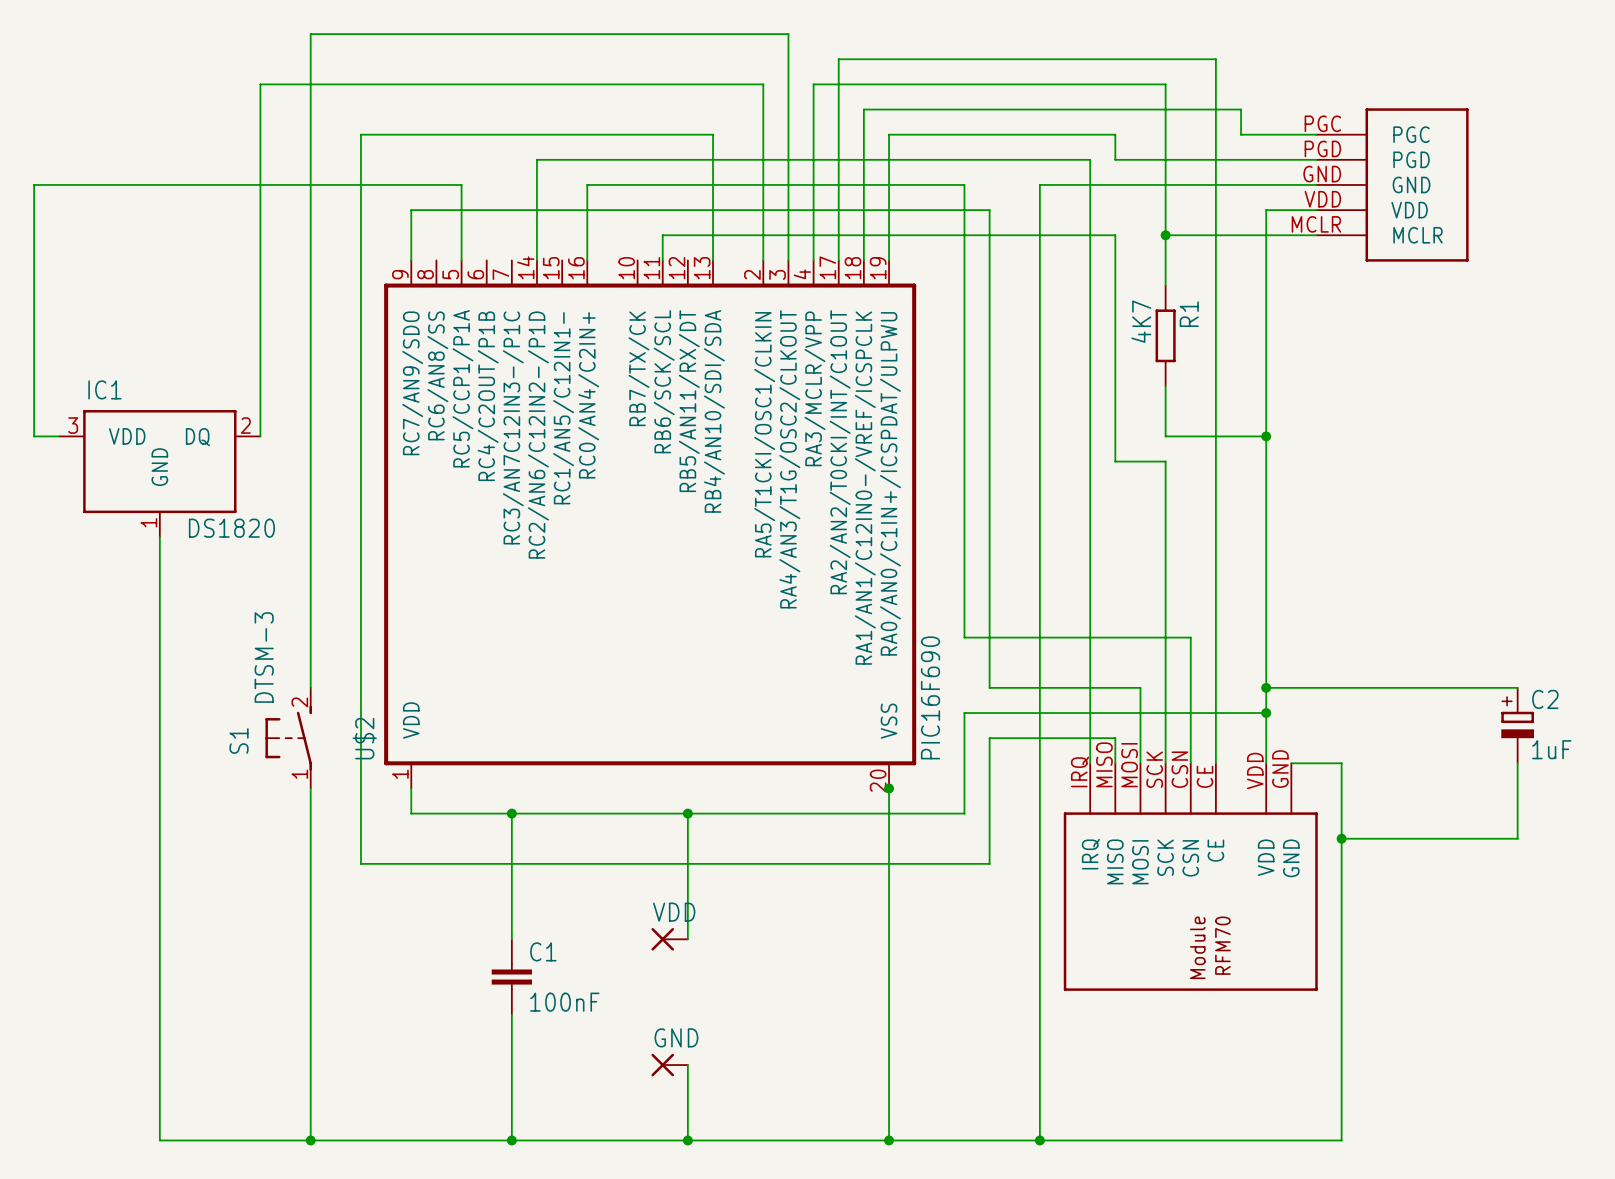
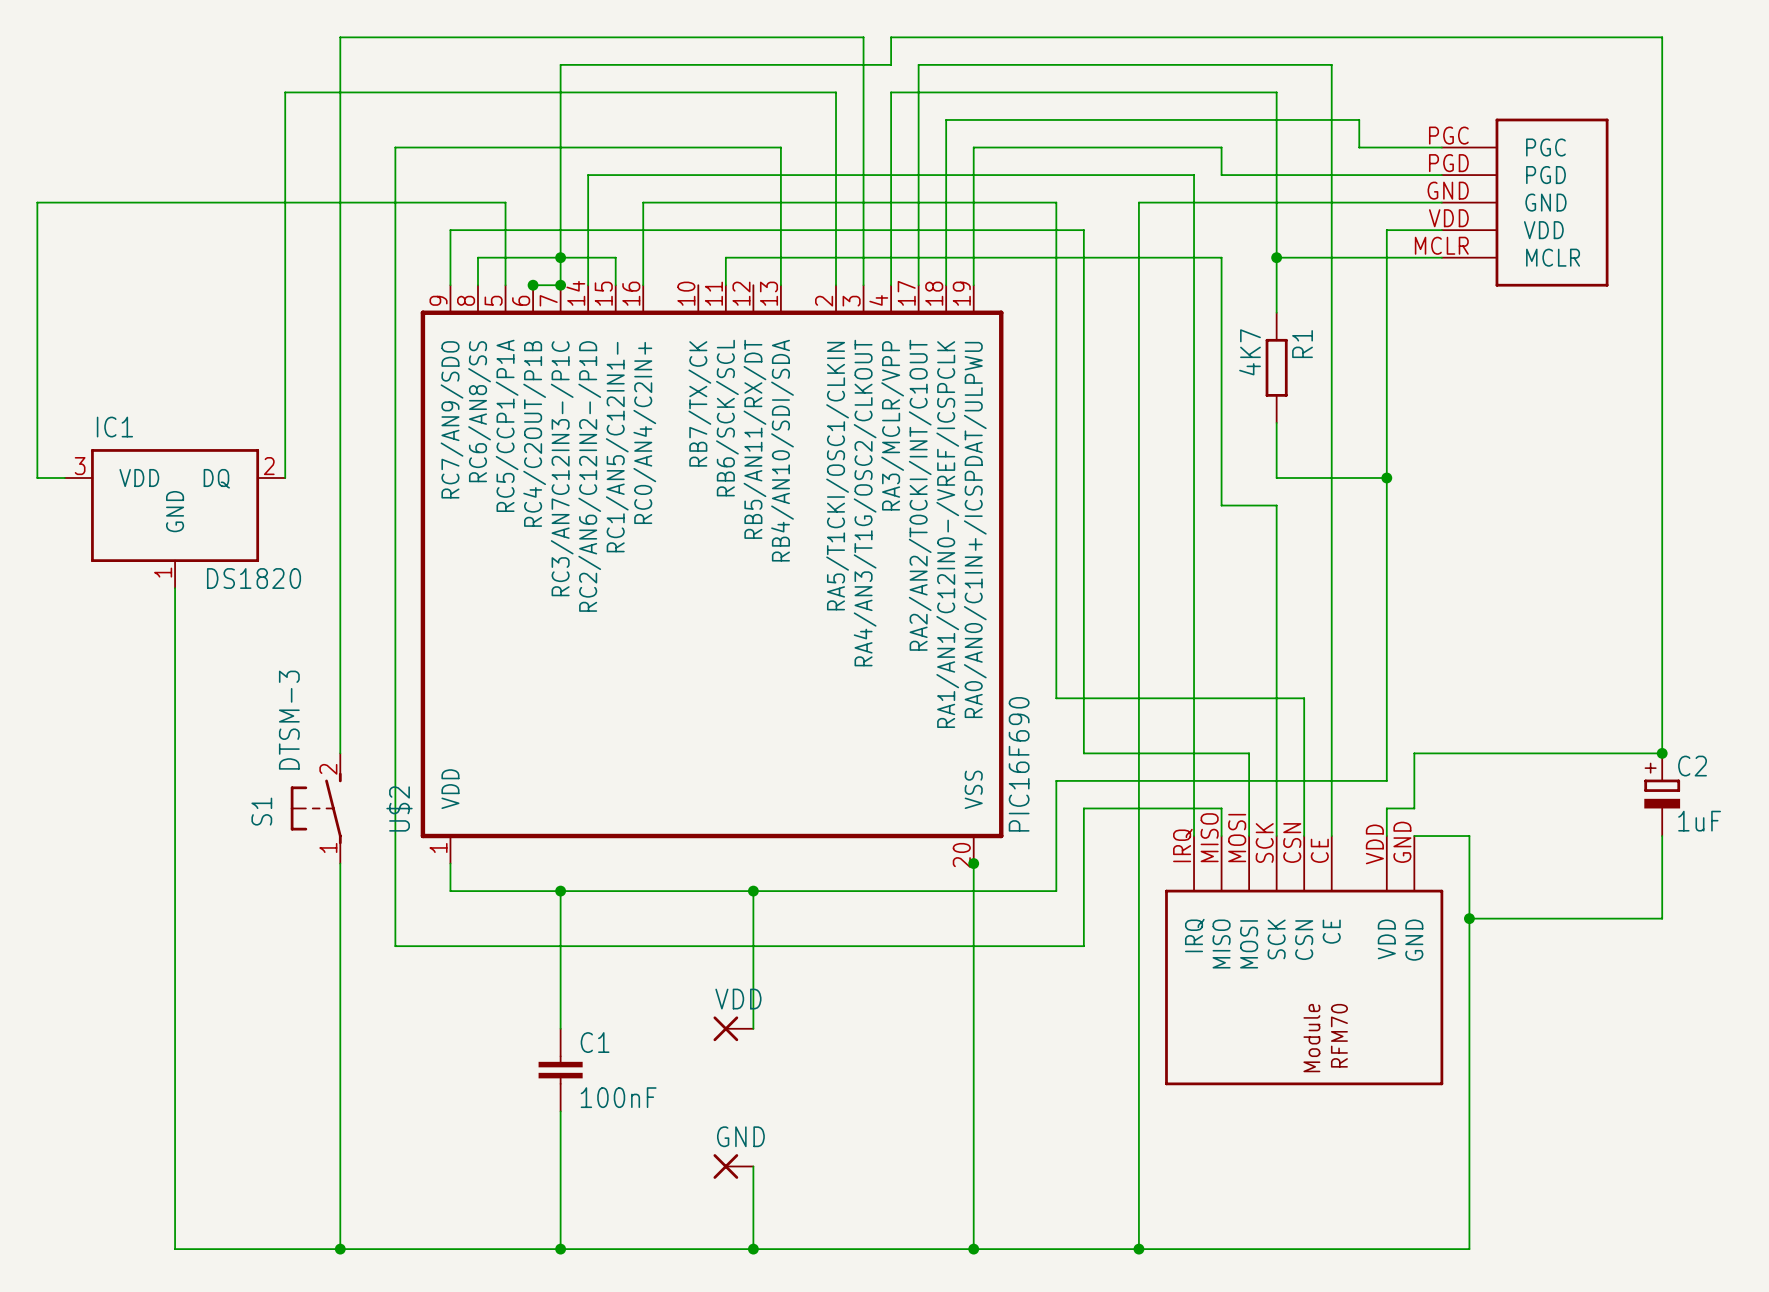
junction: none -> (560, 257)
wire: none -> (477, 285) (477, 257) (615, 257) (615, 285)
wire: none -> (533, 285) (560, 285) (560, 64) (891, 64) (891, 37) (1662, 37) (1662, 753)
junction: none -> (533, 285)
junction: none -> (560, 285)
wire: (1266, 687) (1291, 687) -> none
junction: (1266, 687) -> none
junction: none -> (1662, 753)
wire: (1266, 713) (1266, 738) -> (1414, 753) (1414, 808) (1386, 808)
junction: (1266, 713) -> none

